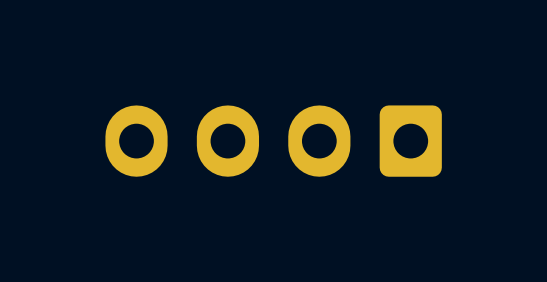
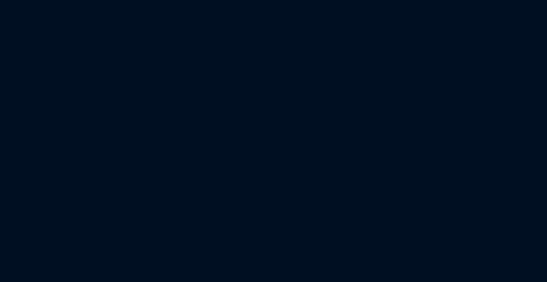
part: (273, 141) -> none

